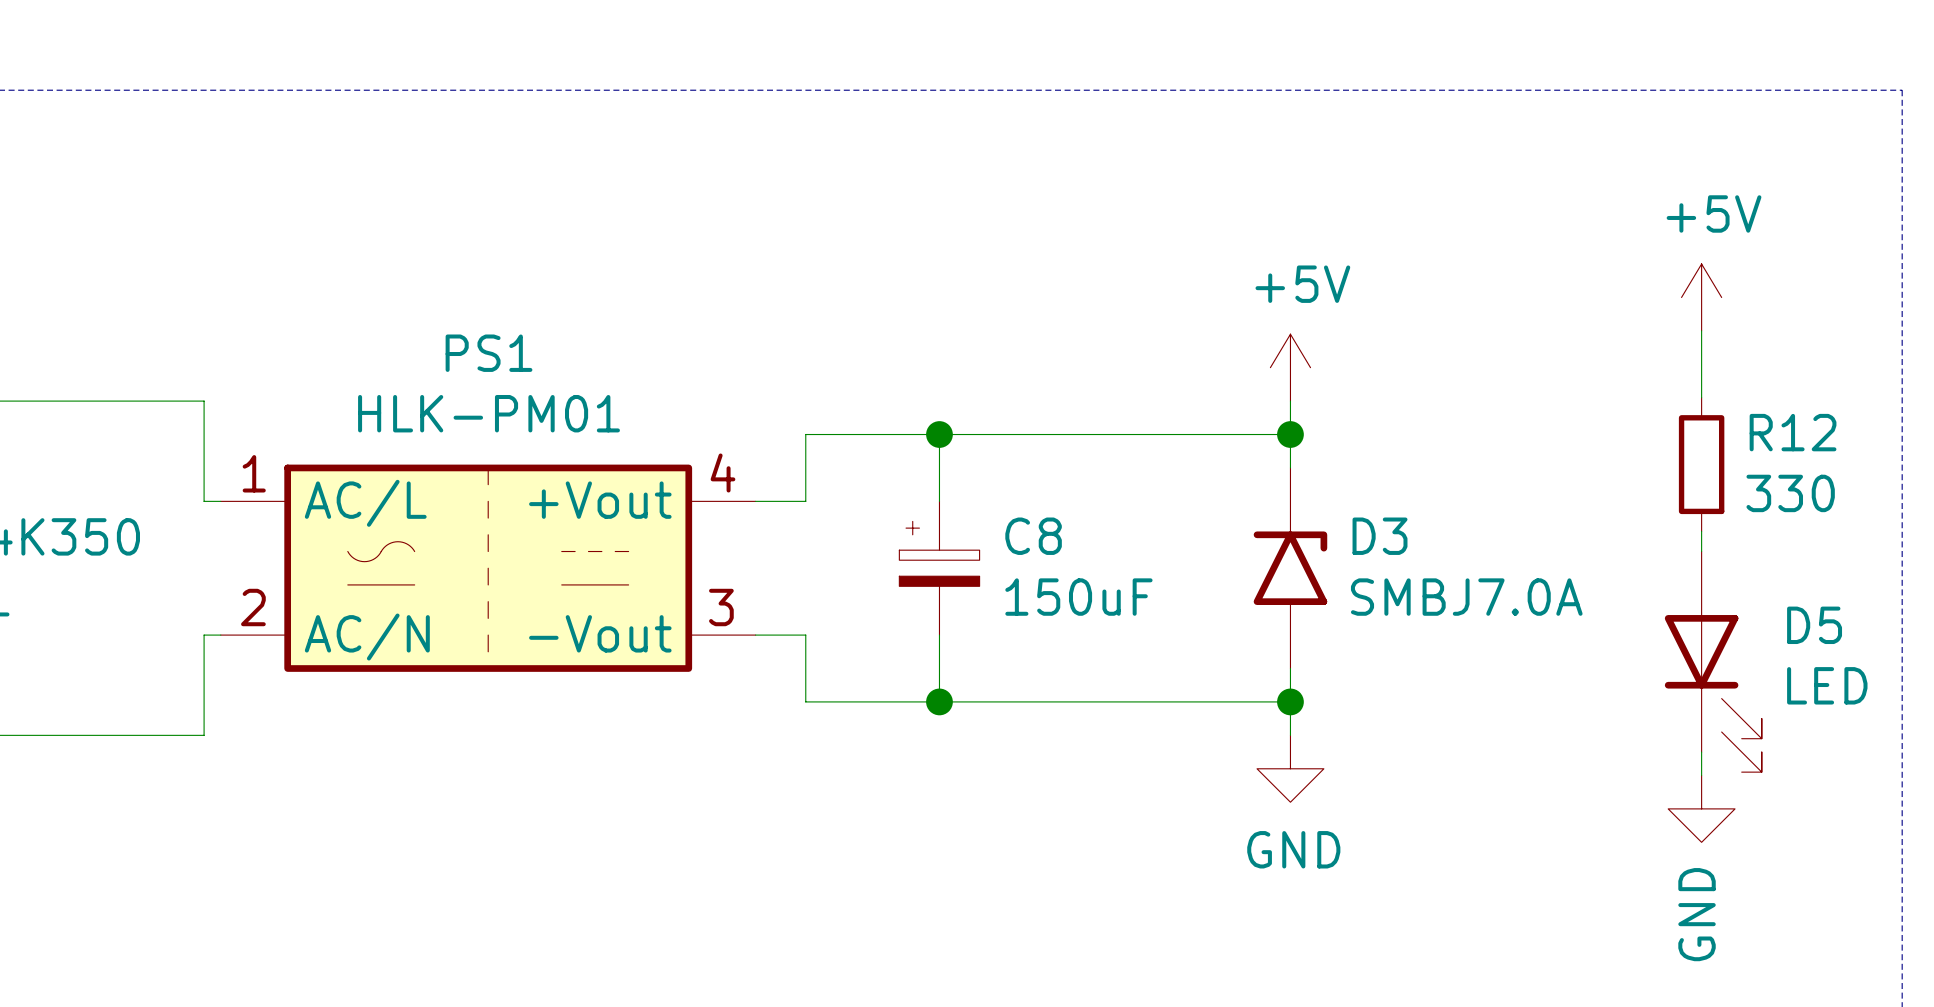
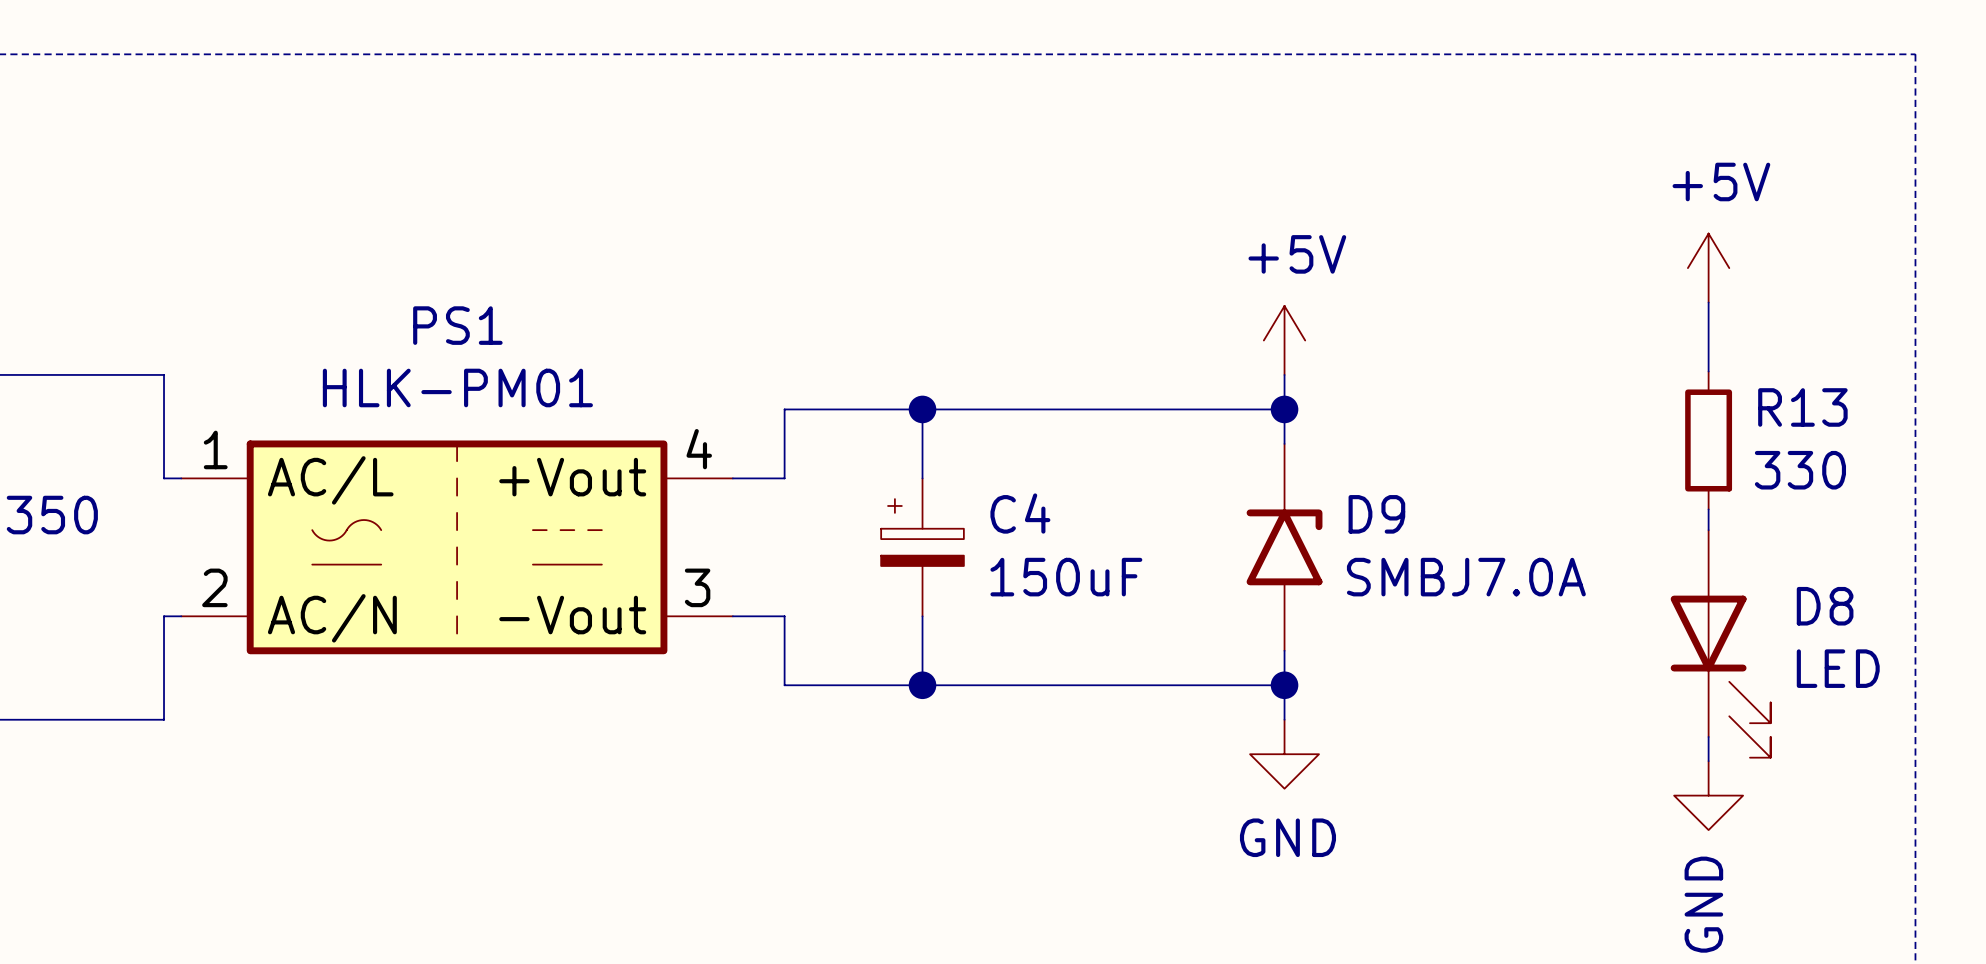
R12 name: R12 (1793, 432) -> R13 (1802, 407)
C8 name: C8 (1033, 536) -> C4 (1020, 513)
D3 name: D3 (1380, 536) -> D9 (1376, 514)
D5 name: D5 (1814, 625) -> D8 (1825, 606)

